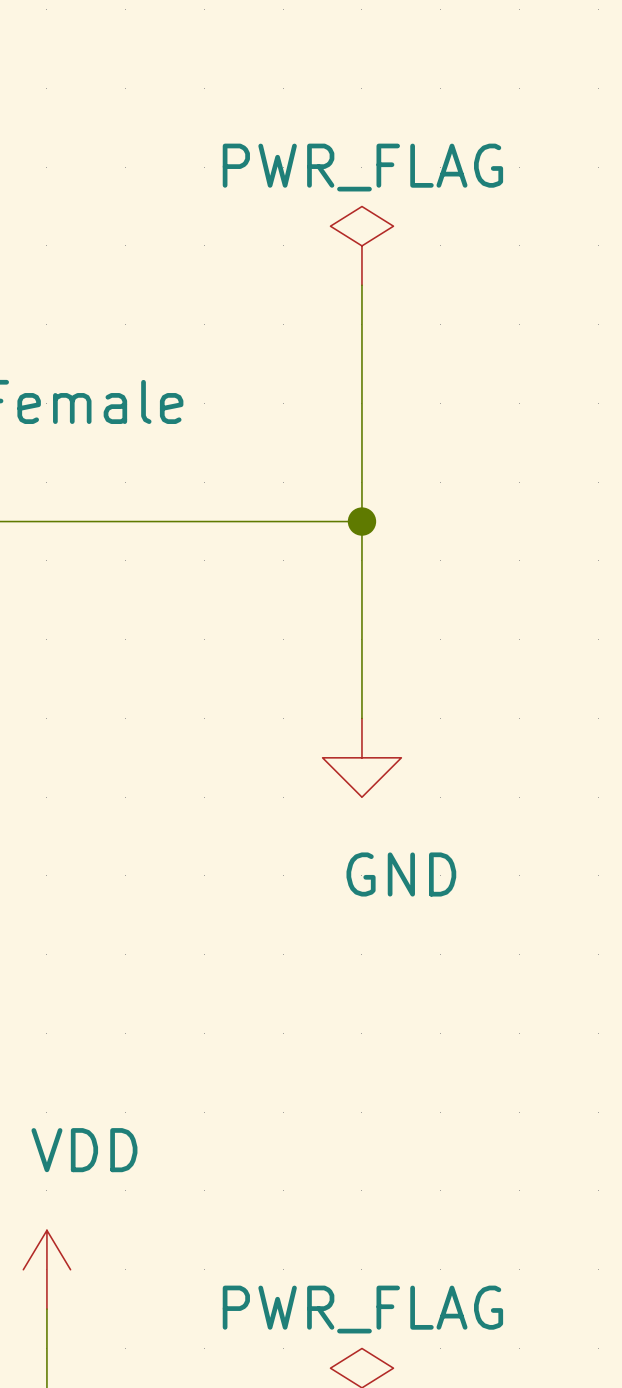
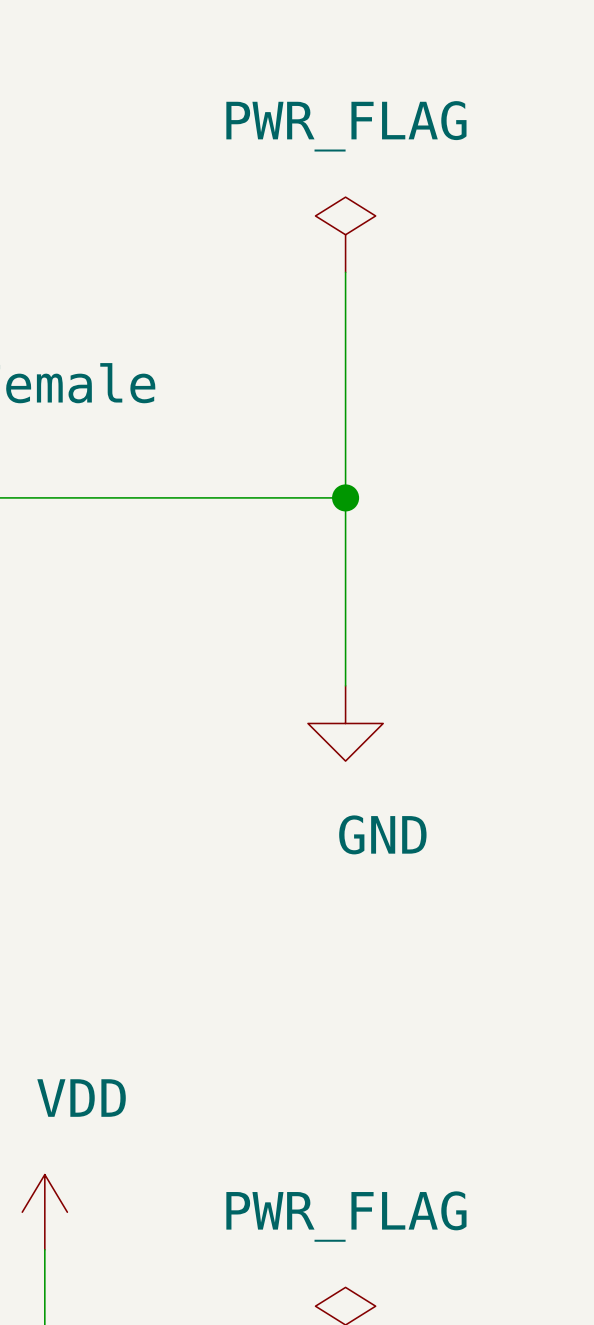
power symbol text position: PWR_FLAG (362, 167) -> PWR_FLAG (346, 126)
power symbol text position: PWR_FLAG (362, 1309) -> PWR_FLAG (346, 1216)

